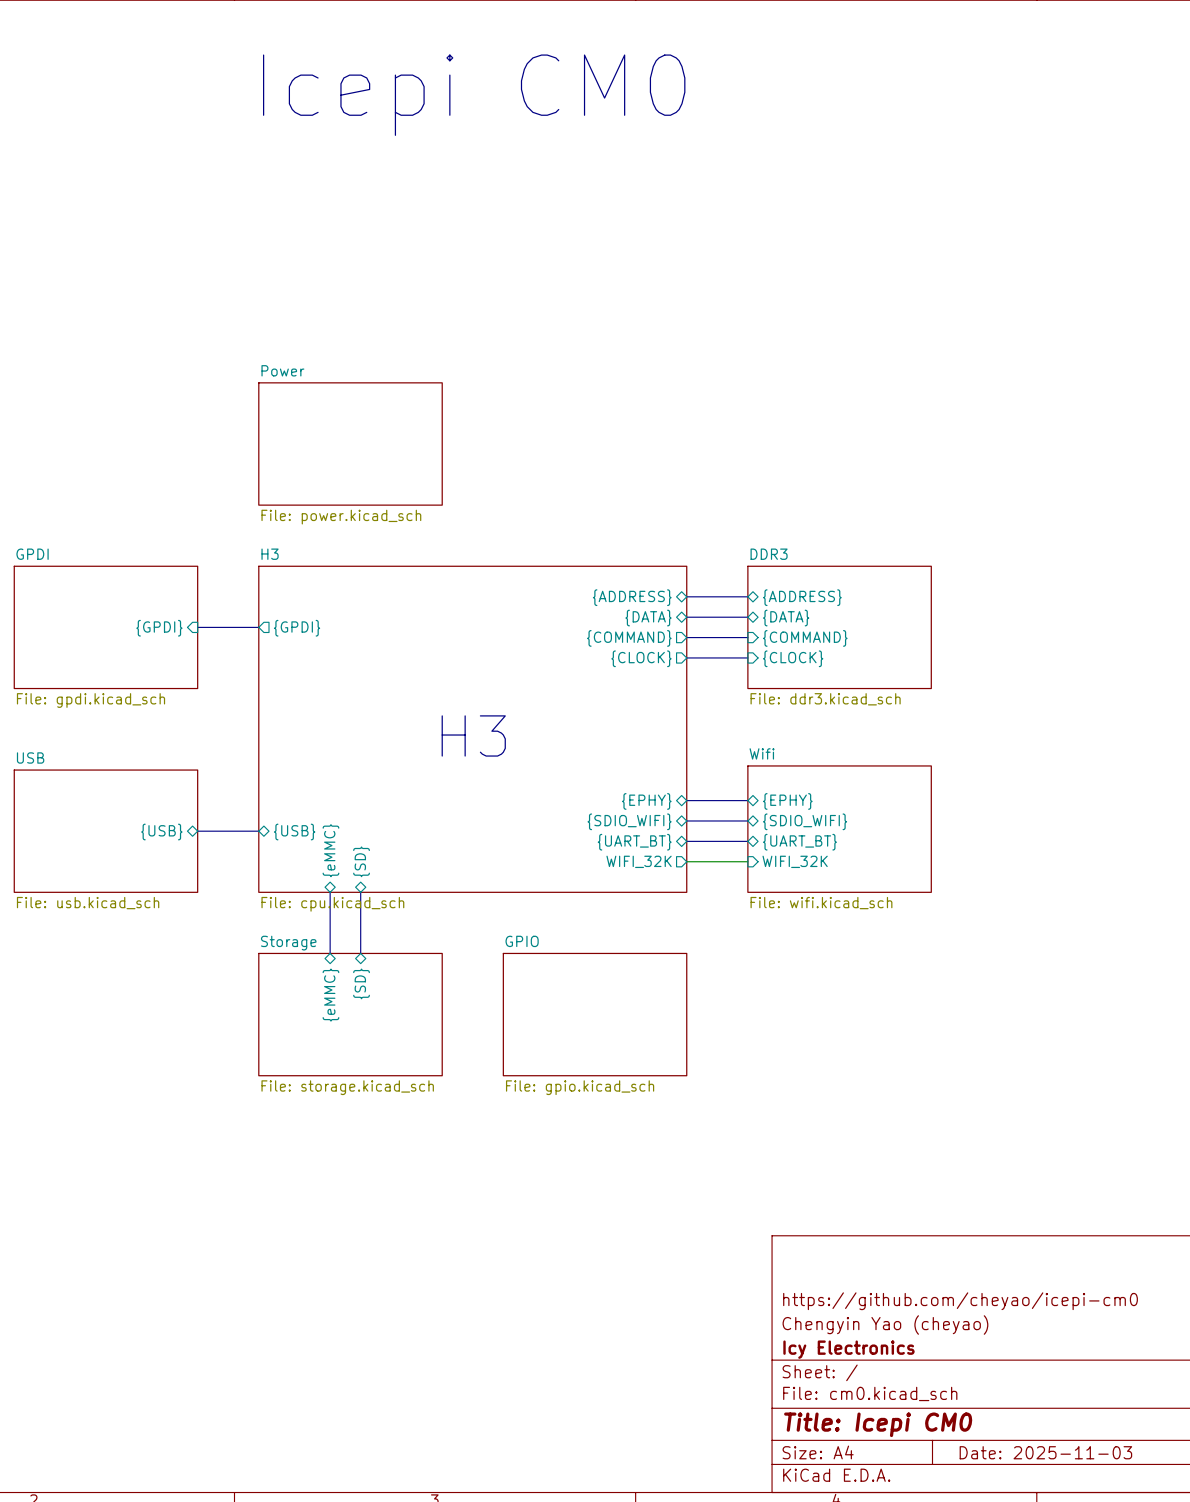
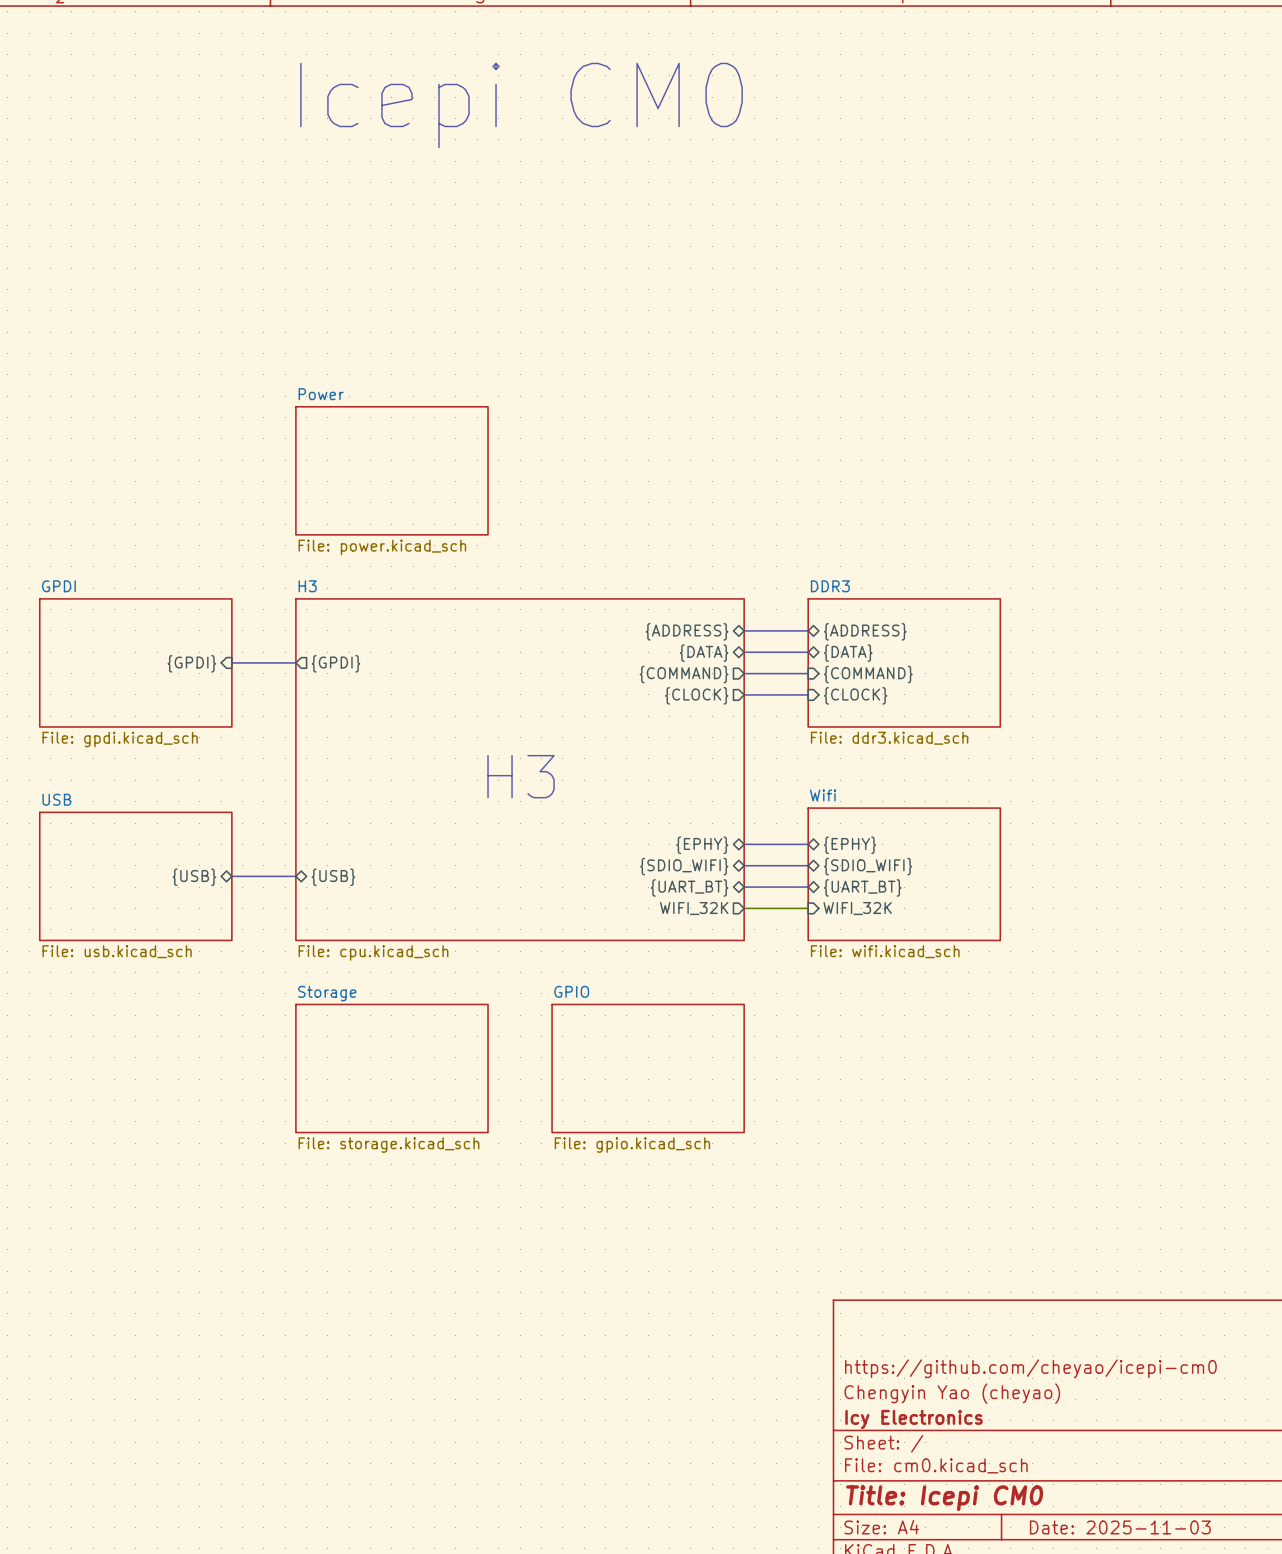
sheet pin: {eMMC} (330, 850) -> none
sheet pin: {SD} (361, 861) -> none
bus: (330, 892) (330, 953) -> none
bus: (360, 892) (360, 953) -> none
sheet pin: {SD} (361, 983) -> none
sheet pin: {eMMC} (330, 995) -> none

